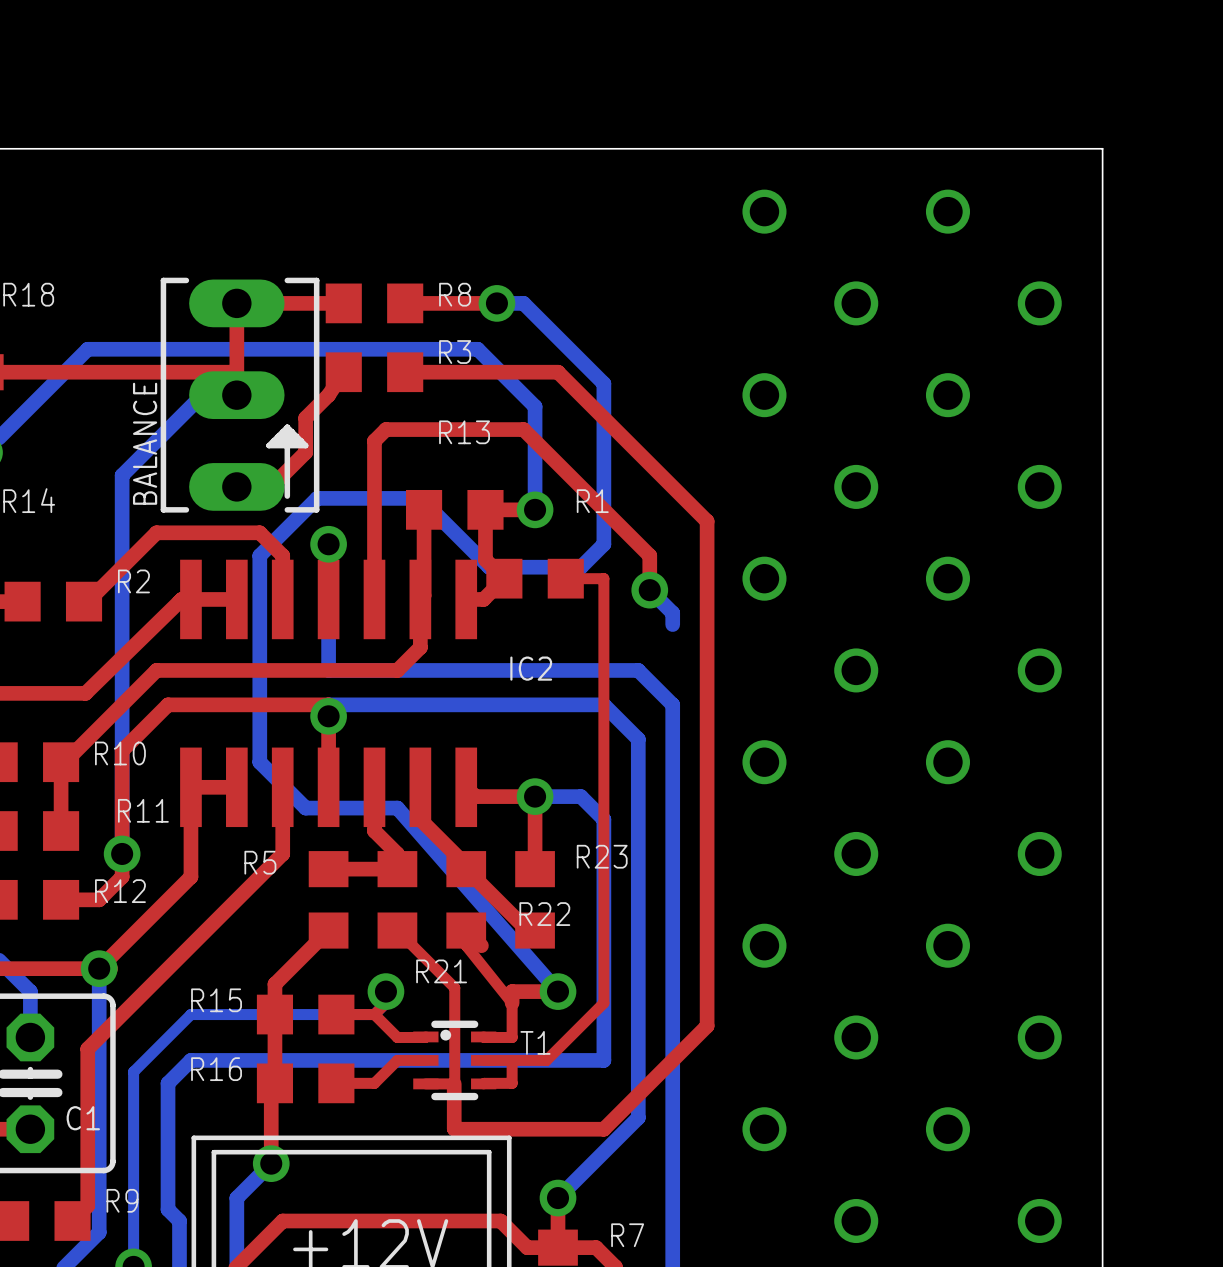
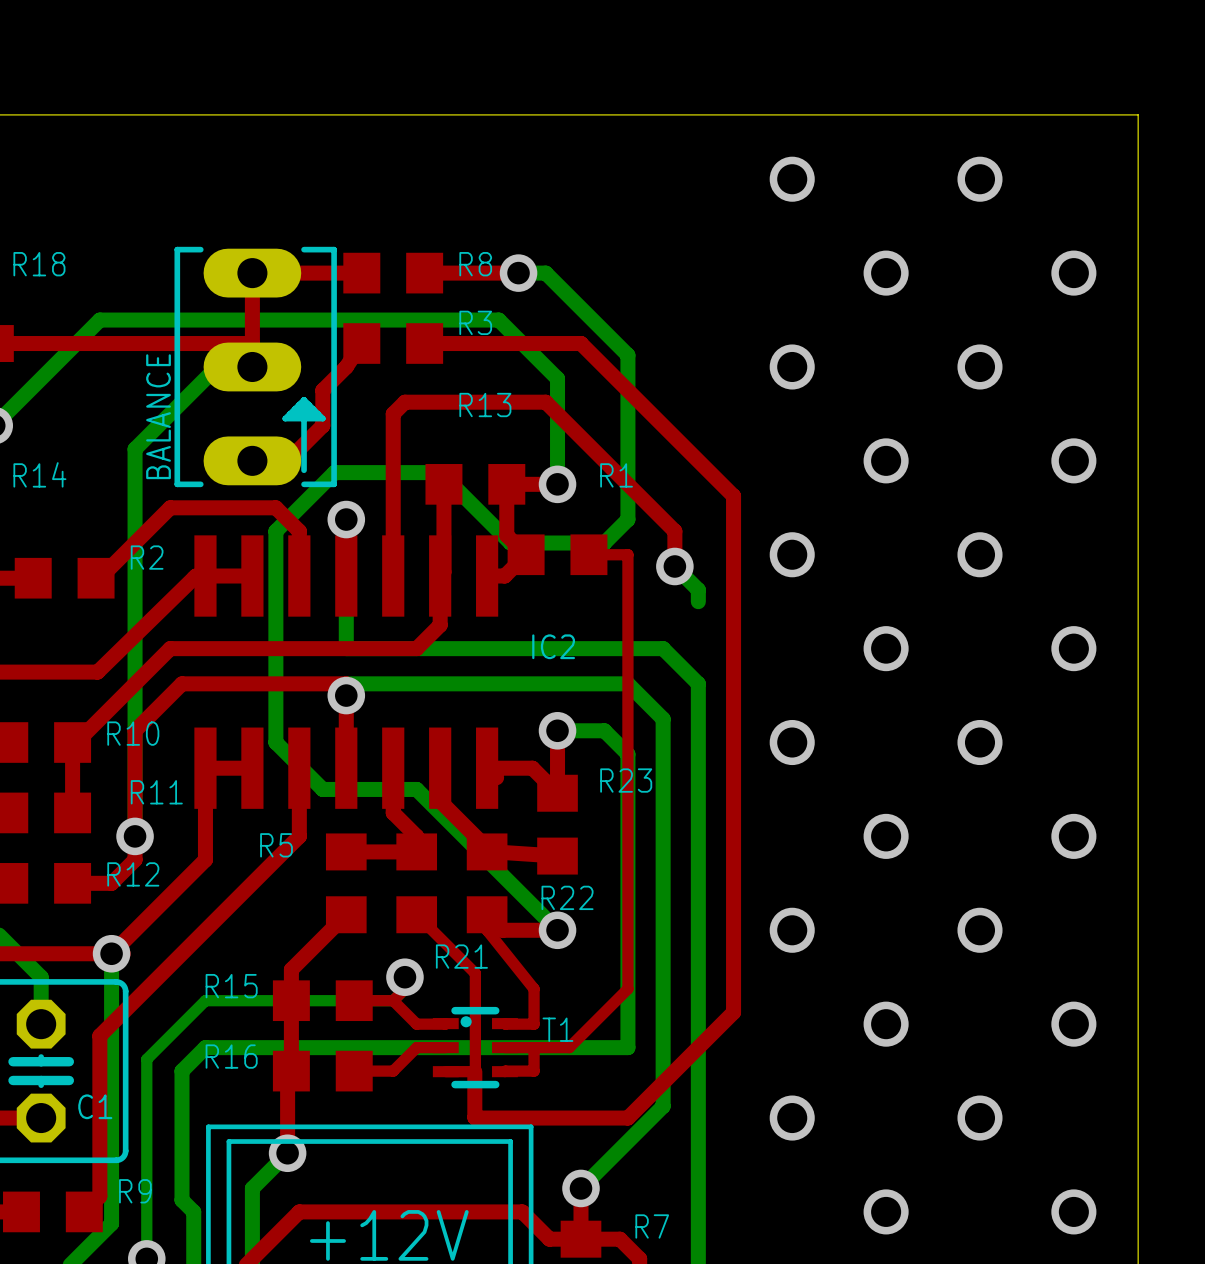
top track: (475, 796) (535, 796) -> (557, 730) (557, 777)
bottom track: (535, 796) (580, 796) (603, 819) -> (557, 730) (604, 730) (627, 754) (627, 801)
via position: (535, 796) -> (557, 730)
bottom track: (397, 808) (558, 991) -> (416, 789) (557, 930)
top track: (535, 811) (535, 869) -> (557, 793) (532, 768) (487, 768)
top track: (466, 869) (527, 930) (535, 930) -> none
top track: none -> (494, 851) (557, 856)
R23 position: (535, 899) -> (557, 824)
top track: none -> (502, 930) (557, 930)
top track: (558, 991) (512, 991) (512, 1003) -> none
via position: (558, 991) -> (557, 930)

